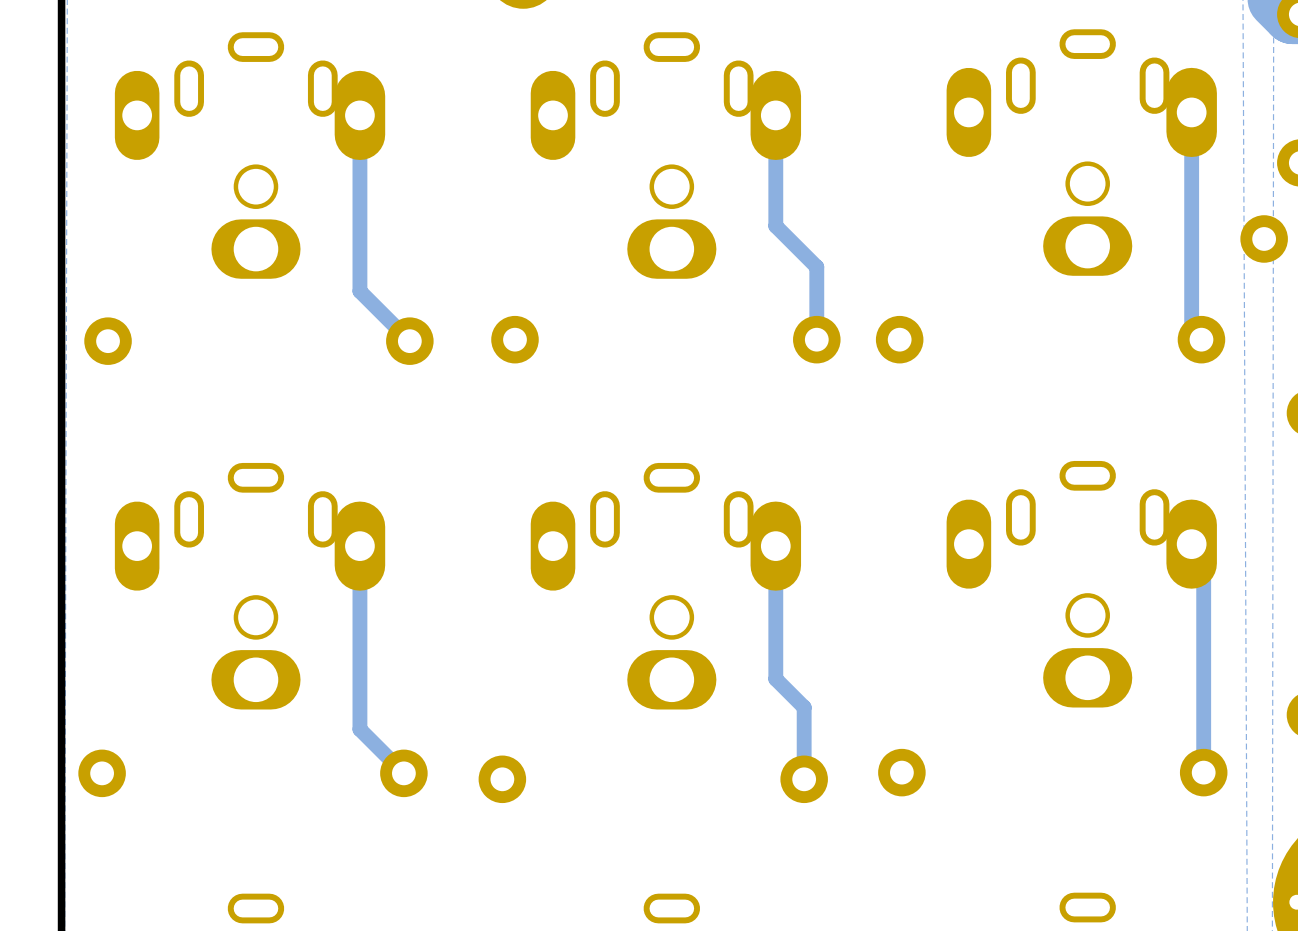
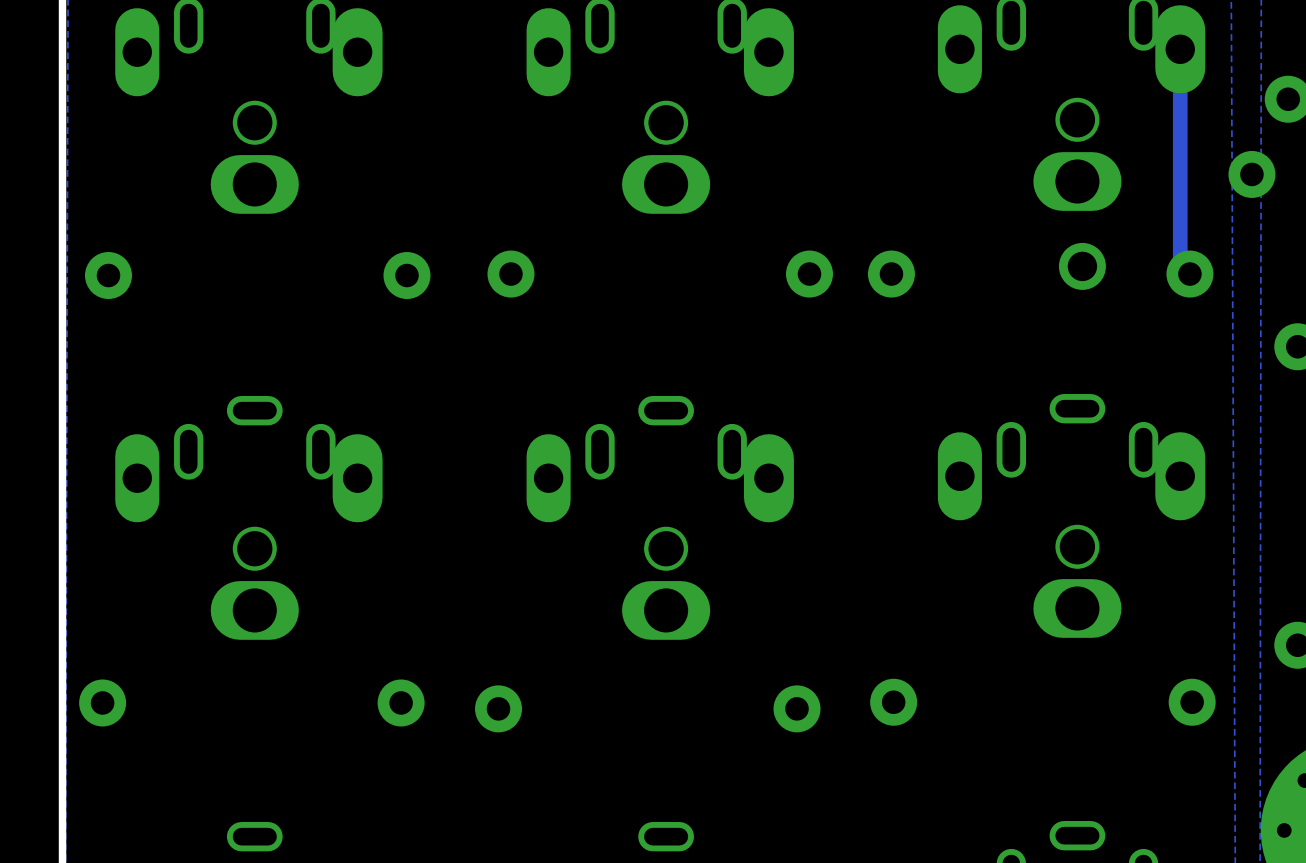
track: (359, 115) (359, 291) (409, 341) -> none
track: (775, 115) (775, 226) (816, 267) (816, 339) -> none
via: none -> (1082, 266)
track: (1191, 544) (1203, 556) (1203, 772) -> none
track: (359, 546) (359, 729) (403, 773) -> none
track: (775, 546) (775, 679) (804, 707) (804, 779) -> none

